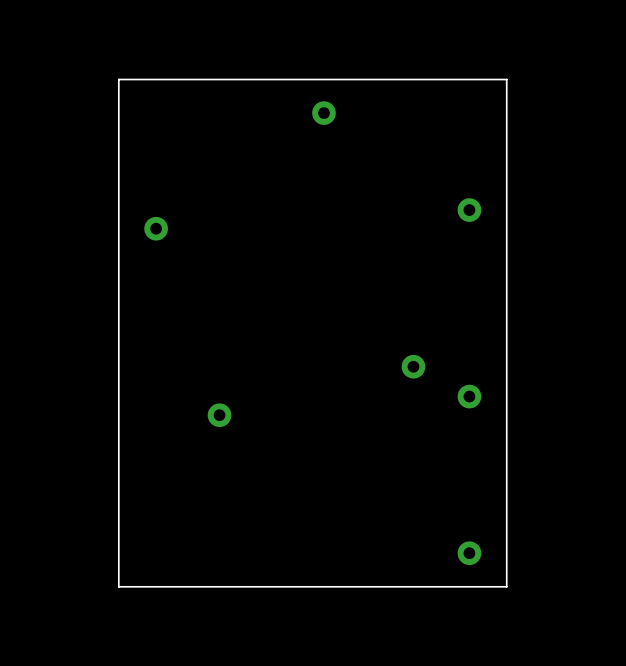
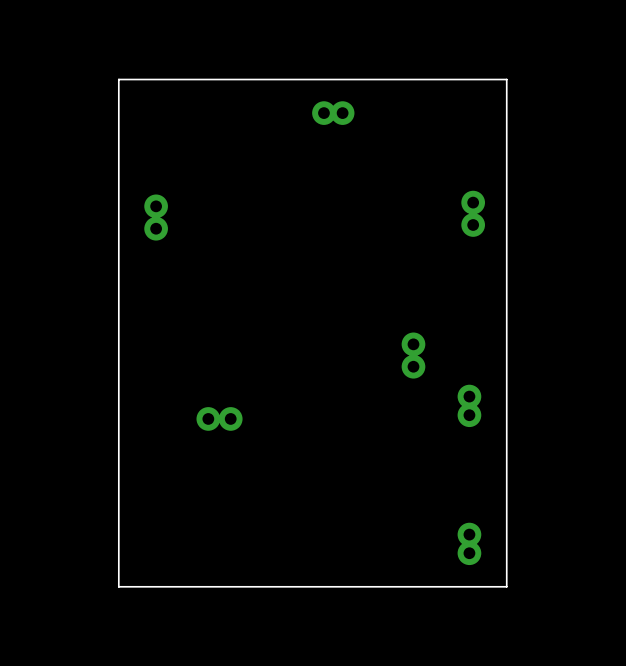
part: none -> (342, 113)
part: none -> (473, 202)
part: none -> (156, 206)
part: (469, 210) -> none
part: none -> (473, 224)
part: none -> (413, 344)
part: (219, 415) -> none
part: none -> (469, 415)
part: none -> (208, 418)
part: none -> (230, 418)
part: none -> (469, 534)

